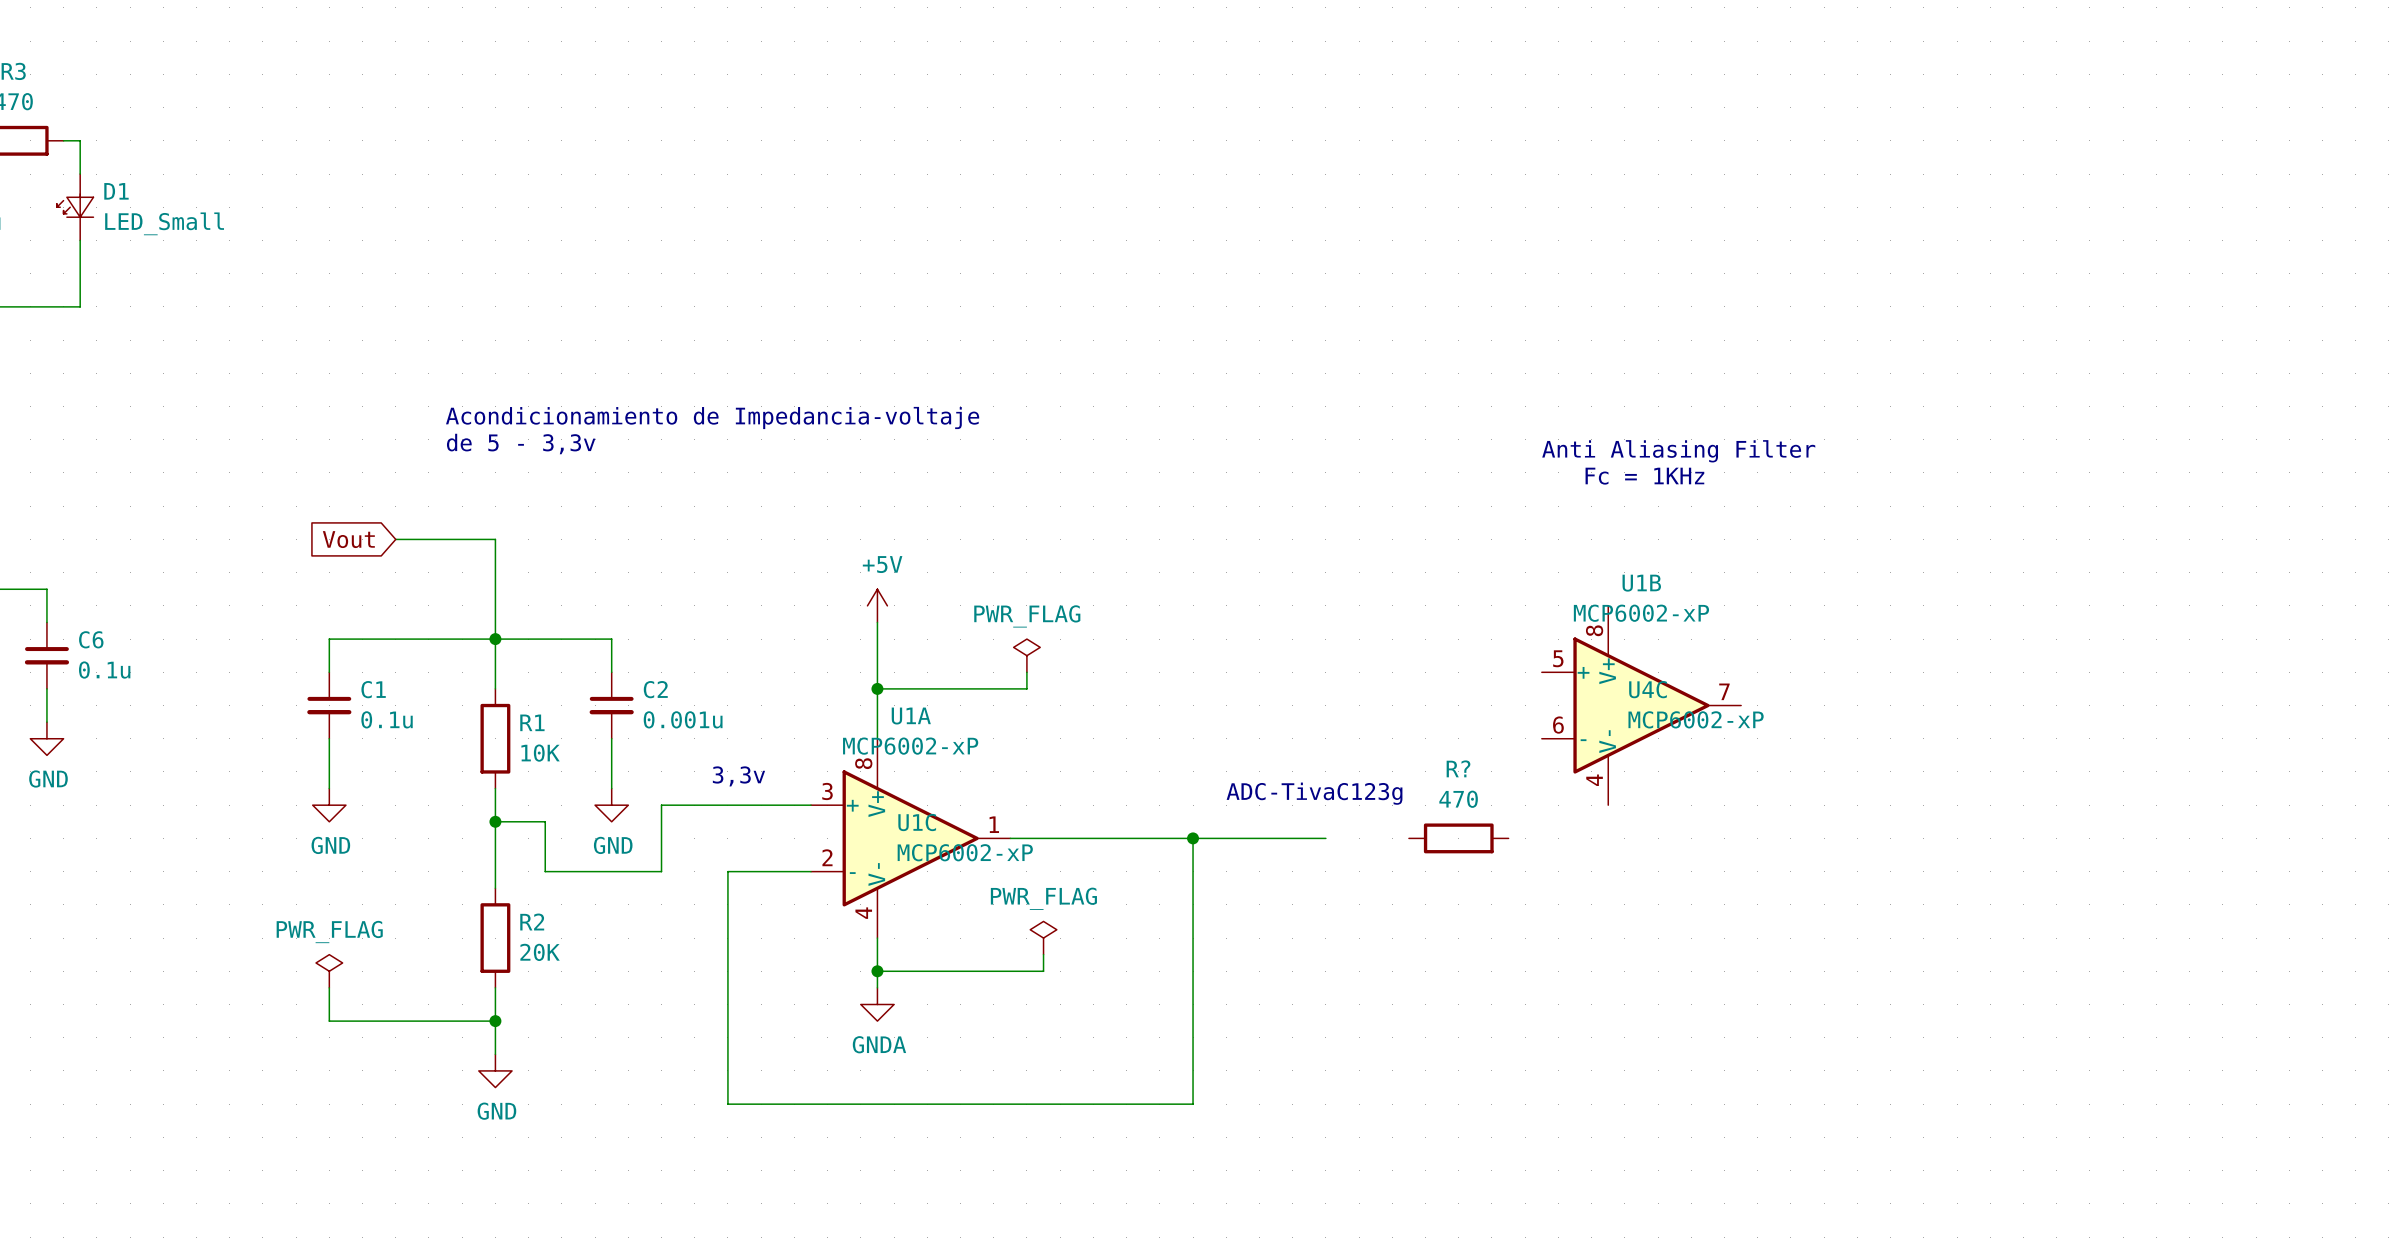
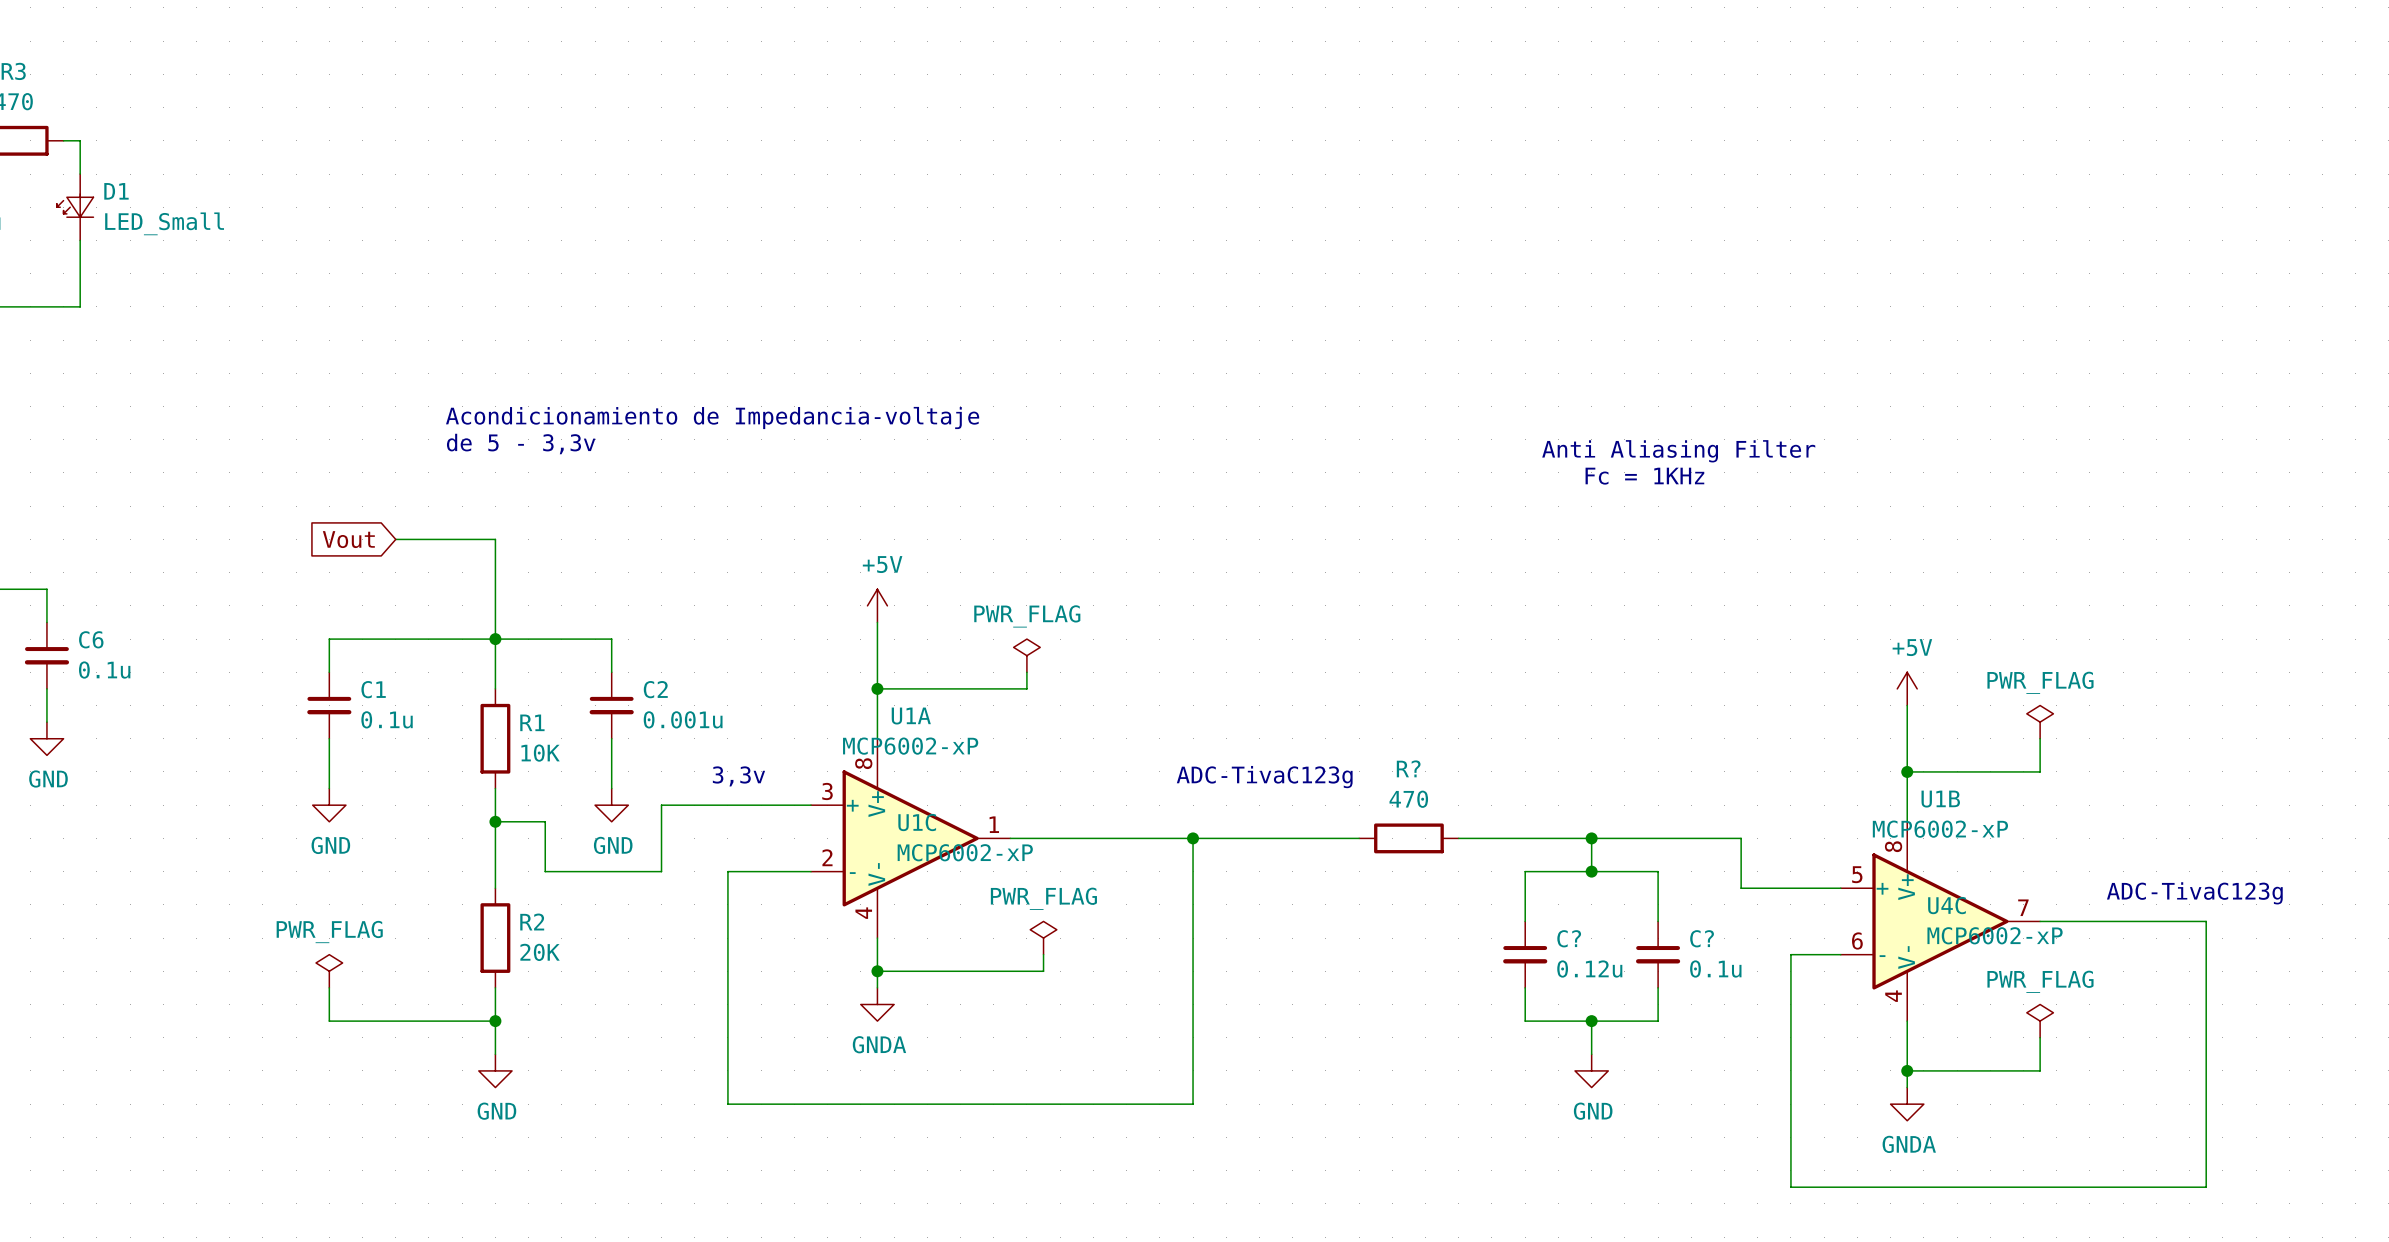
power symbol: none -> +5V (1907, 688)
U4C position: (1608, 705) -> (1907, 921)
U1B position: (1641, 705) -> (1940, 921)
wire: none -> (1907, 705) (1907, 821)
power symbol: none -> PWR_FLAG (2040, 722)
wire: none -> (2040, 738) (2040, 771) (1907, 771)
junction: none -> (1907, 771)
text position: ADC-TivaC123g (1314, 793) -> ADC-TivaC123g (1264, 777)
wire: none -> (1325, 838) (1359, 838)
wire: none -> (1458, 838) (1741, 838) (1741, 888) (1840, 888)
R? position: (1458, 838) -> (1408, 838)
wire: none -> (1591, 838) (1591, 871)
junction: none -> (1591, 838)
junction: none -> (1591, 871)
text: none -> ADC-TivaC123g (2194, 893)
wire: none -> (1525, 921) (1525, 871) (1658, 871) (1658, 921)
wire: none -> (2040, 921) (2206, 921) (2206, 1187) (1790, 1187) (1790, 954) (1840, 954)
C?: none -> 0.12u (1525, 954)
C?: none -> 0.1u (1658, 954)
wire: none -> (1525, 987) (1525, 1021) (1658, 1021) (1658, 987)
wire: none -> (1591, 1021) (1591, 1054)
junction: none -> (1591, 1021)
wire: none -> (1907, 1021) (1907, 1087)
power symbol: none -> PWR_FLAG (2040, 1021)
wire: none -> (2040, 1037) (2040, 1070) (1907, 1070)
power symbol: none -> GND (1591, 1070)
junction: none -> (1907, 1070)
power symbol: none -> GNDA (1907, 1104)

